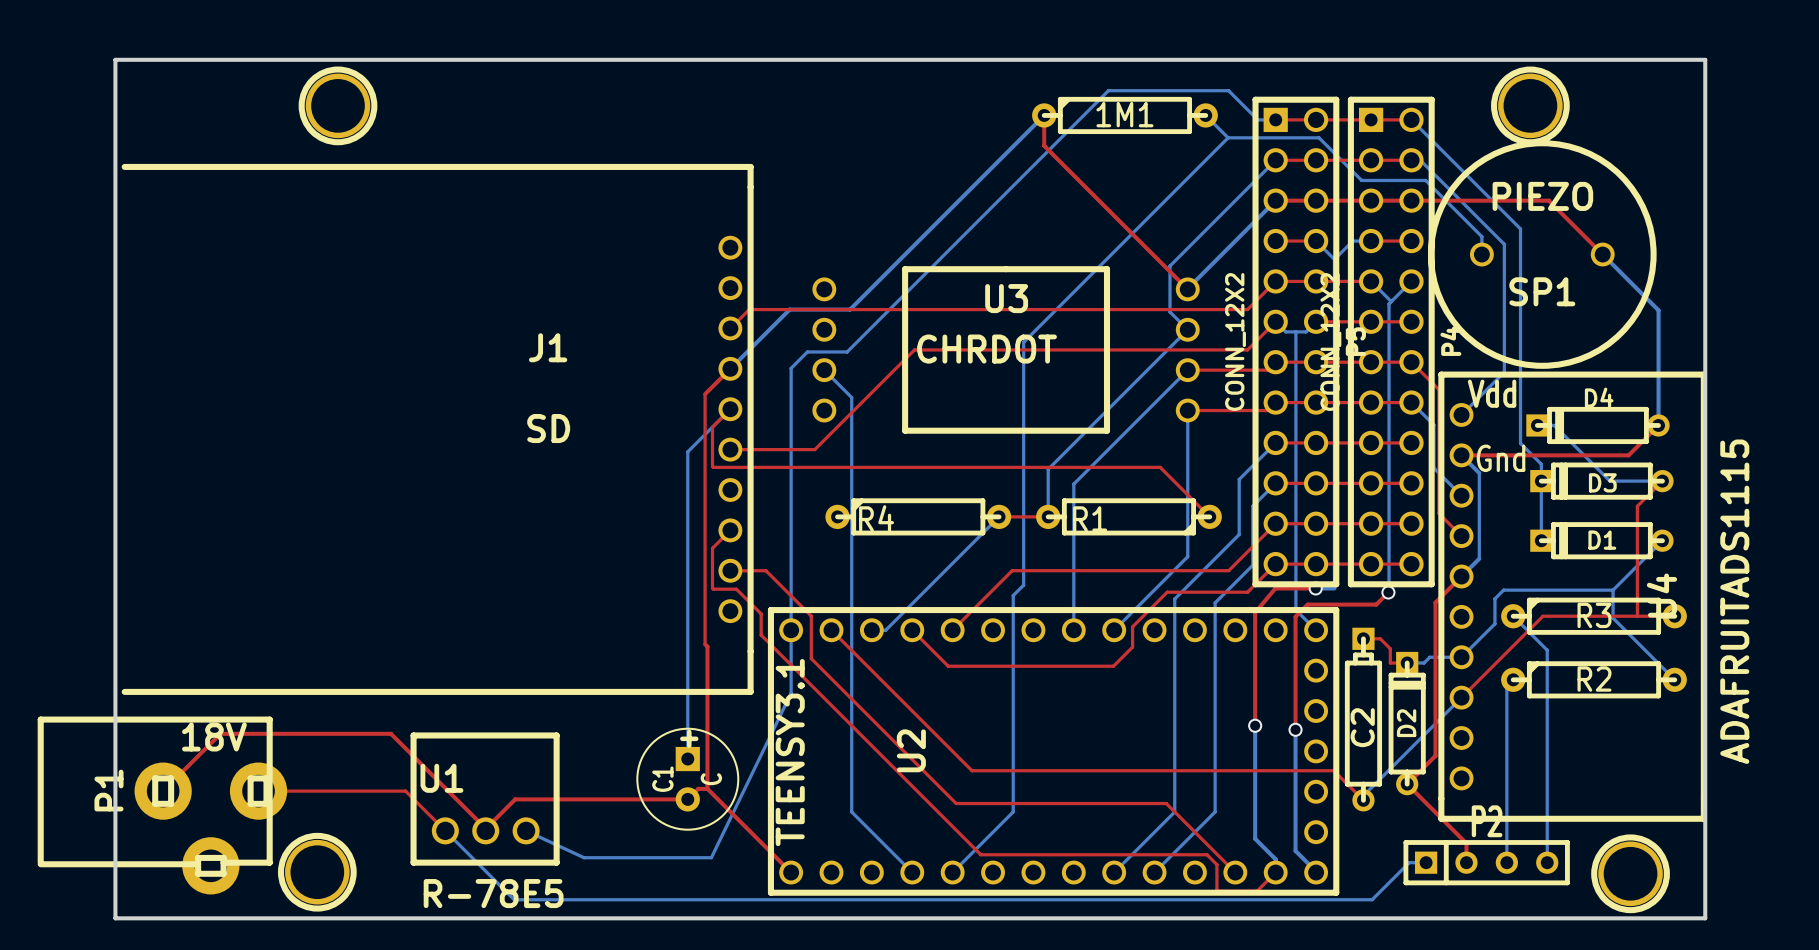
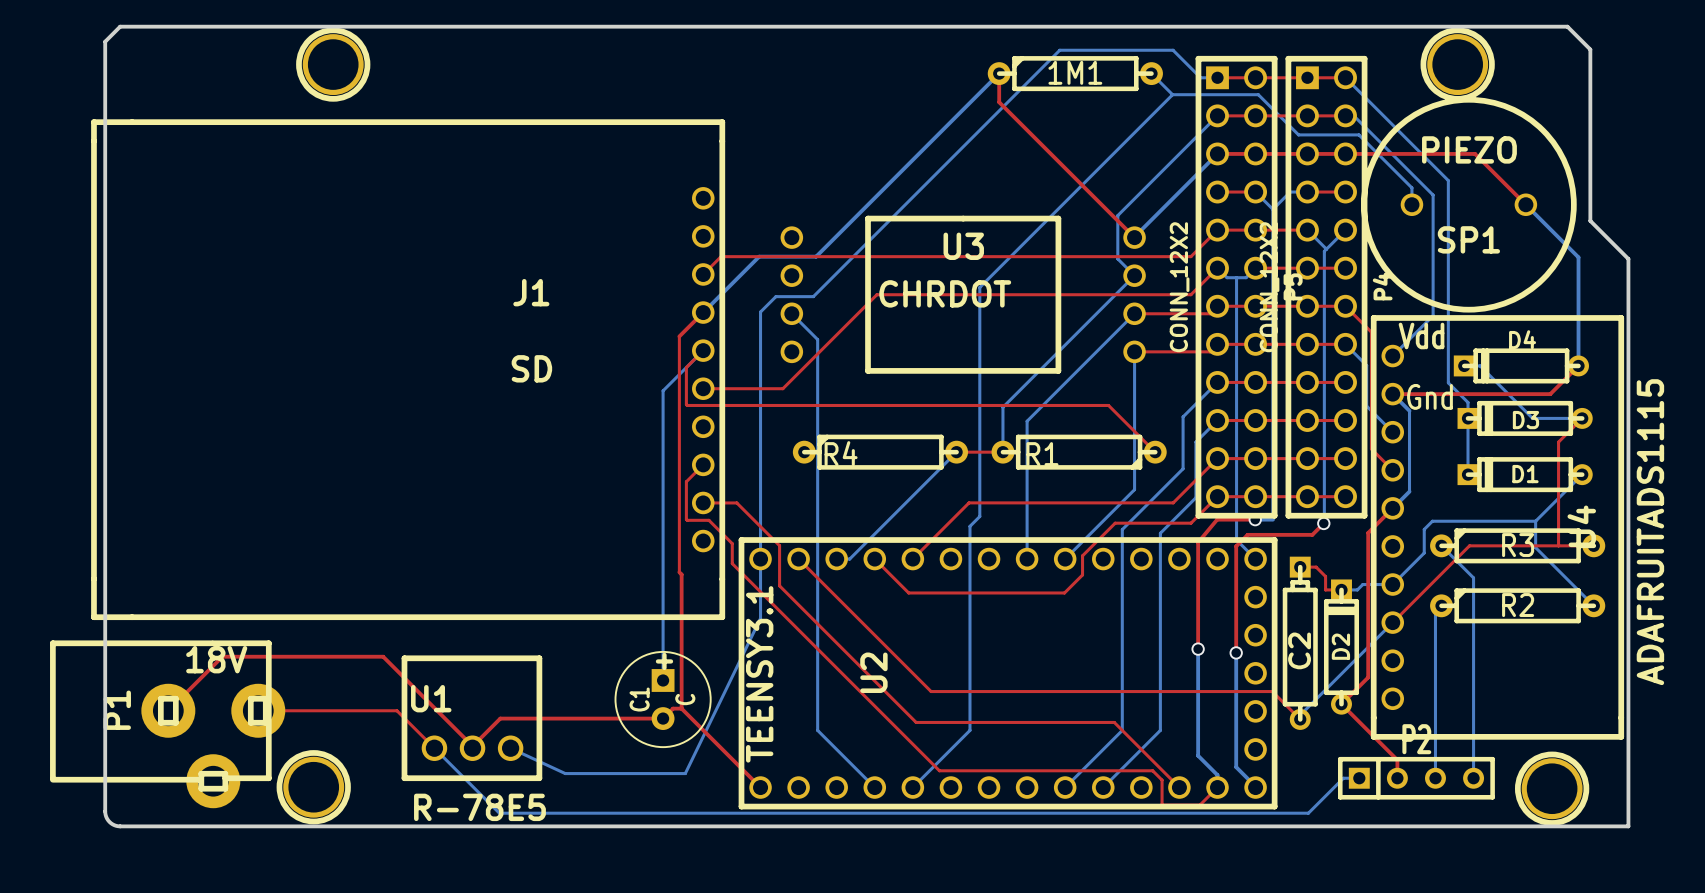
board edge: (115, 59) (115, 918) (1705, 918) (1705, 59) (115, 59) -> (120, 26) (105, 41) (105, 811) (107, 818) (112, 824) (120, 826) (1628, 826) (1628, 259) (1590, 220) (1590, 49) (1567, 26) (120, 26)
J1 footprint: [121, 163, 754, 695] -> [91, 119, 726, 621]

